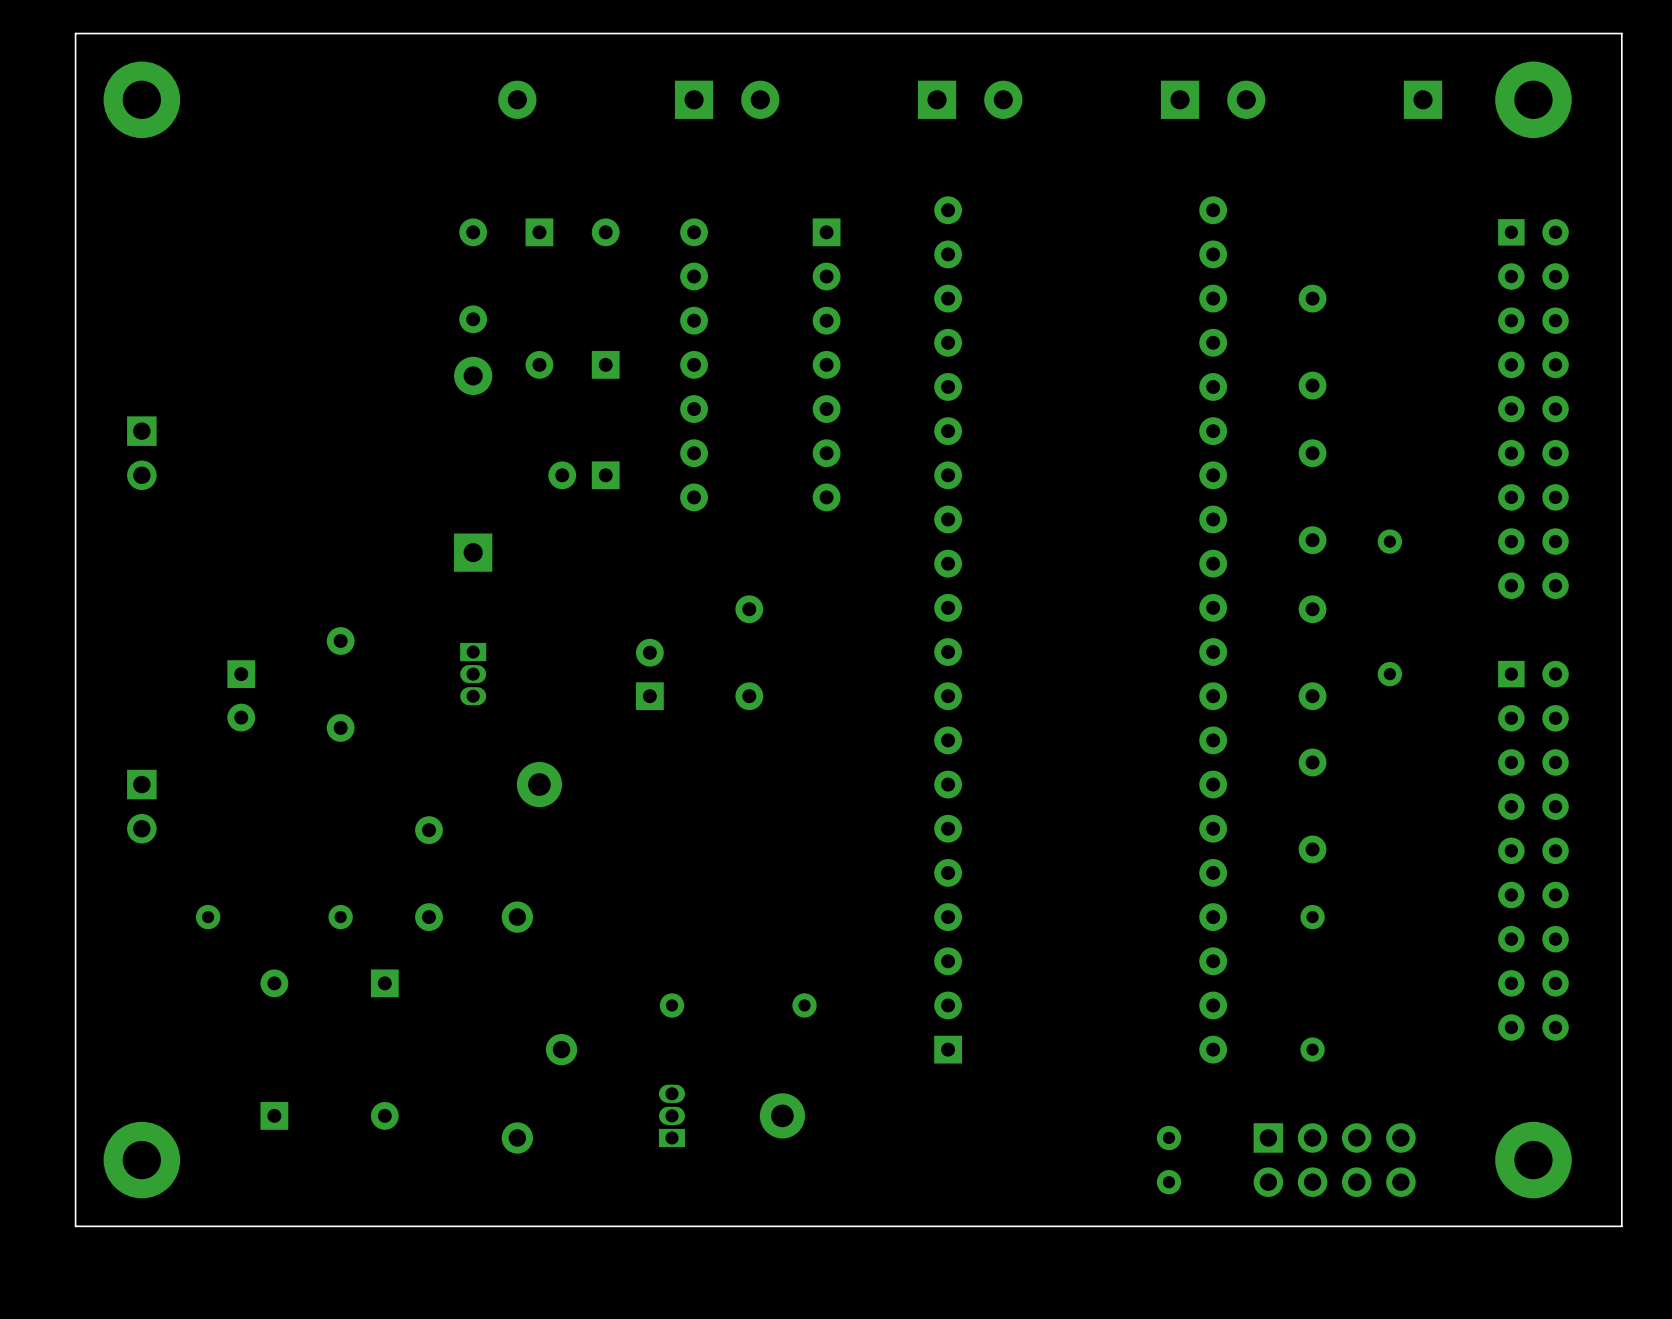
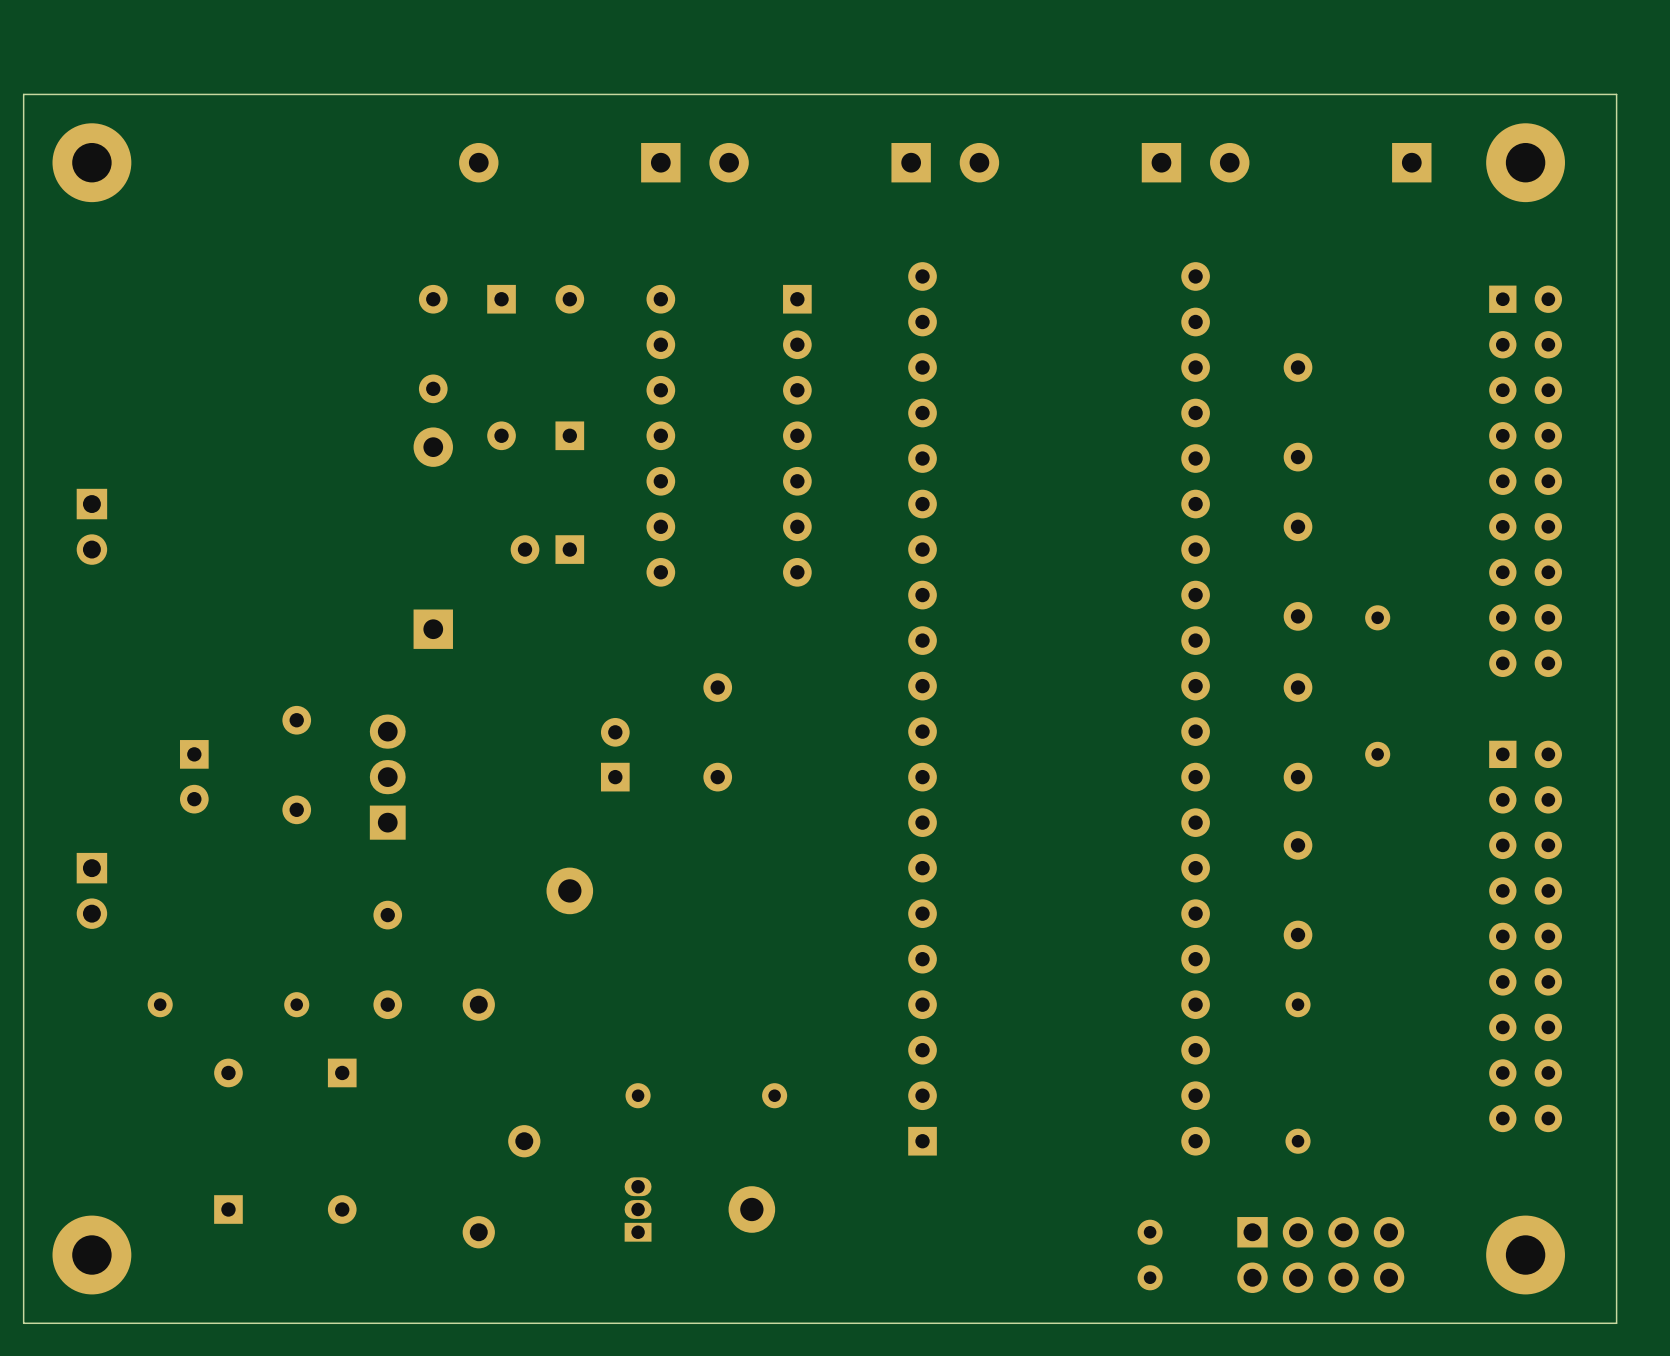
part: (473, 674) -> none
part: none -> (387, 777)
part position: (539, 784) -> (569, 890)

